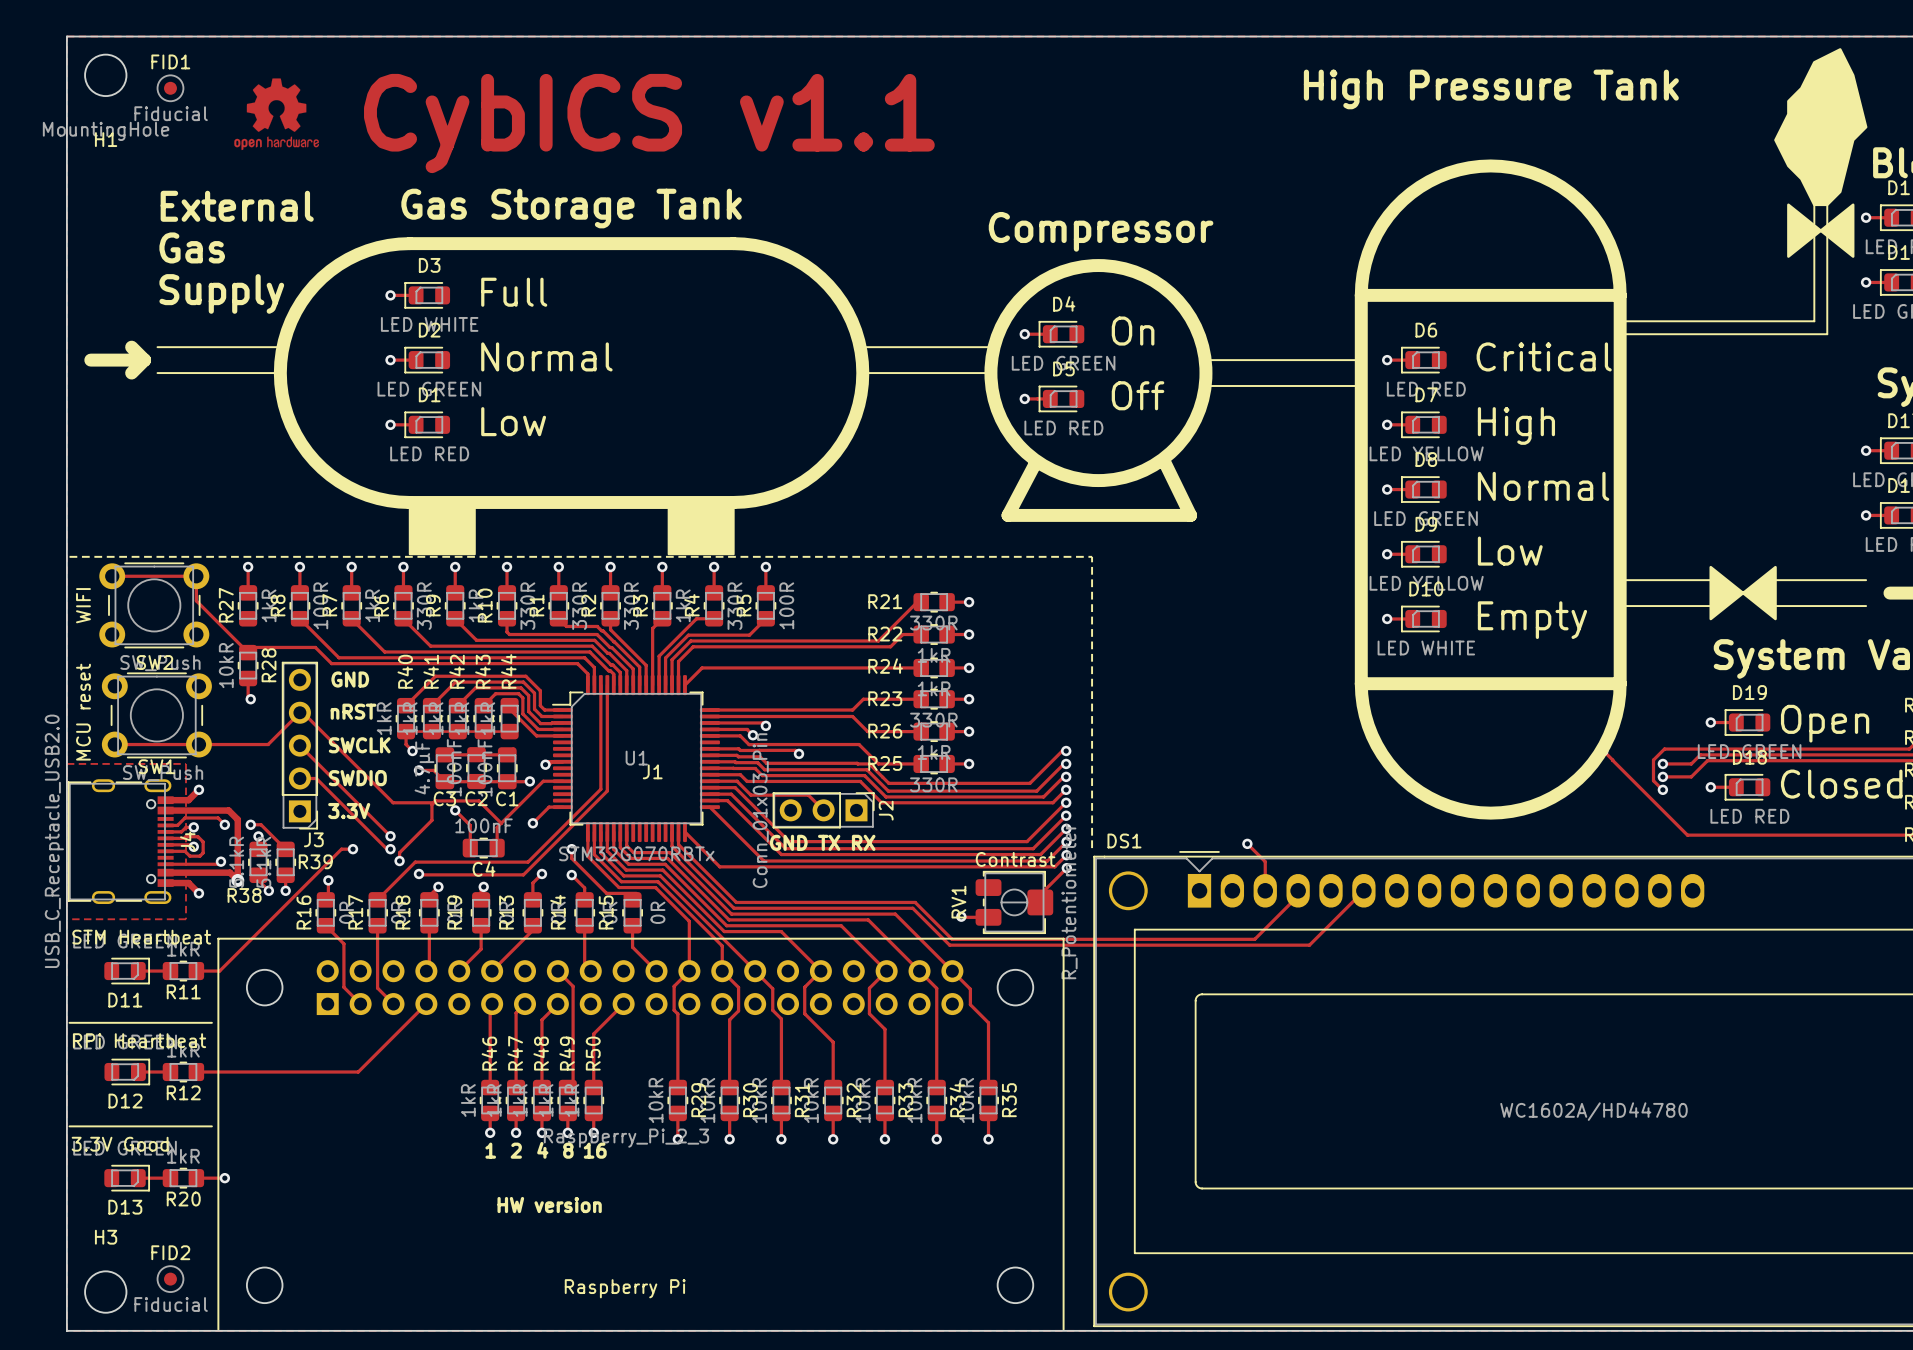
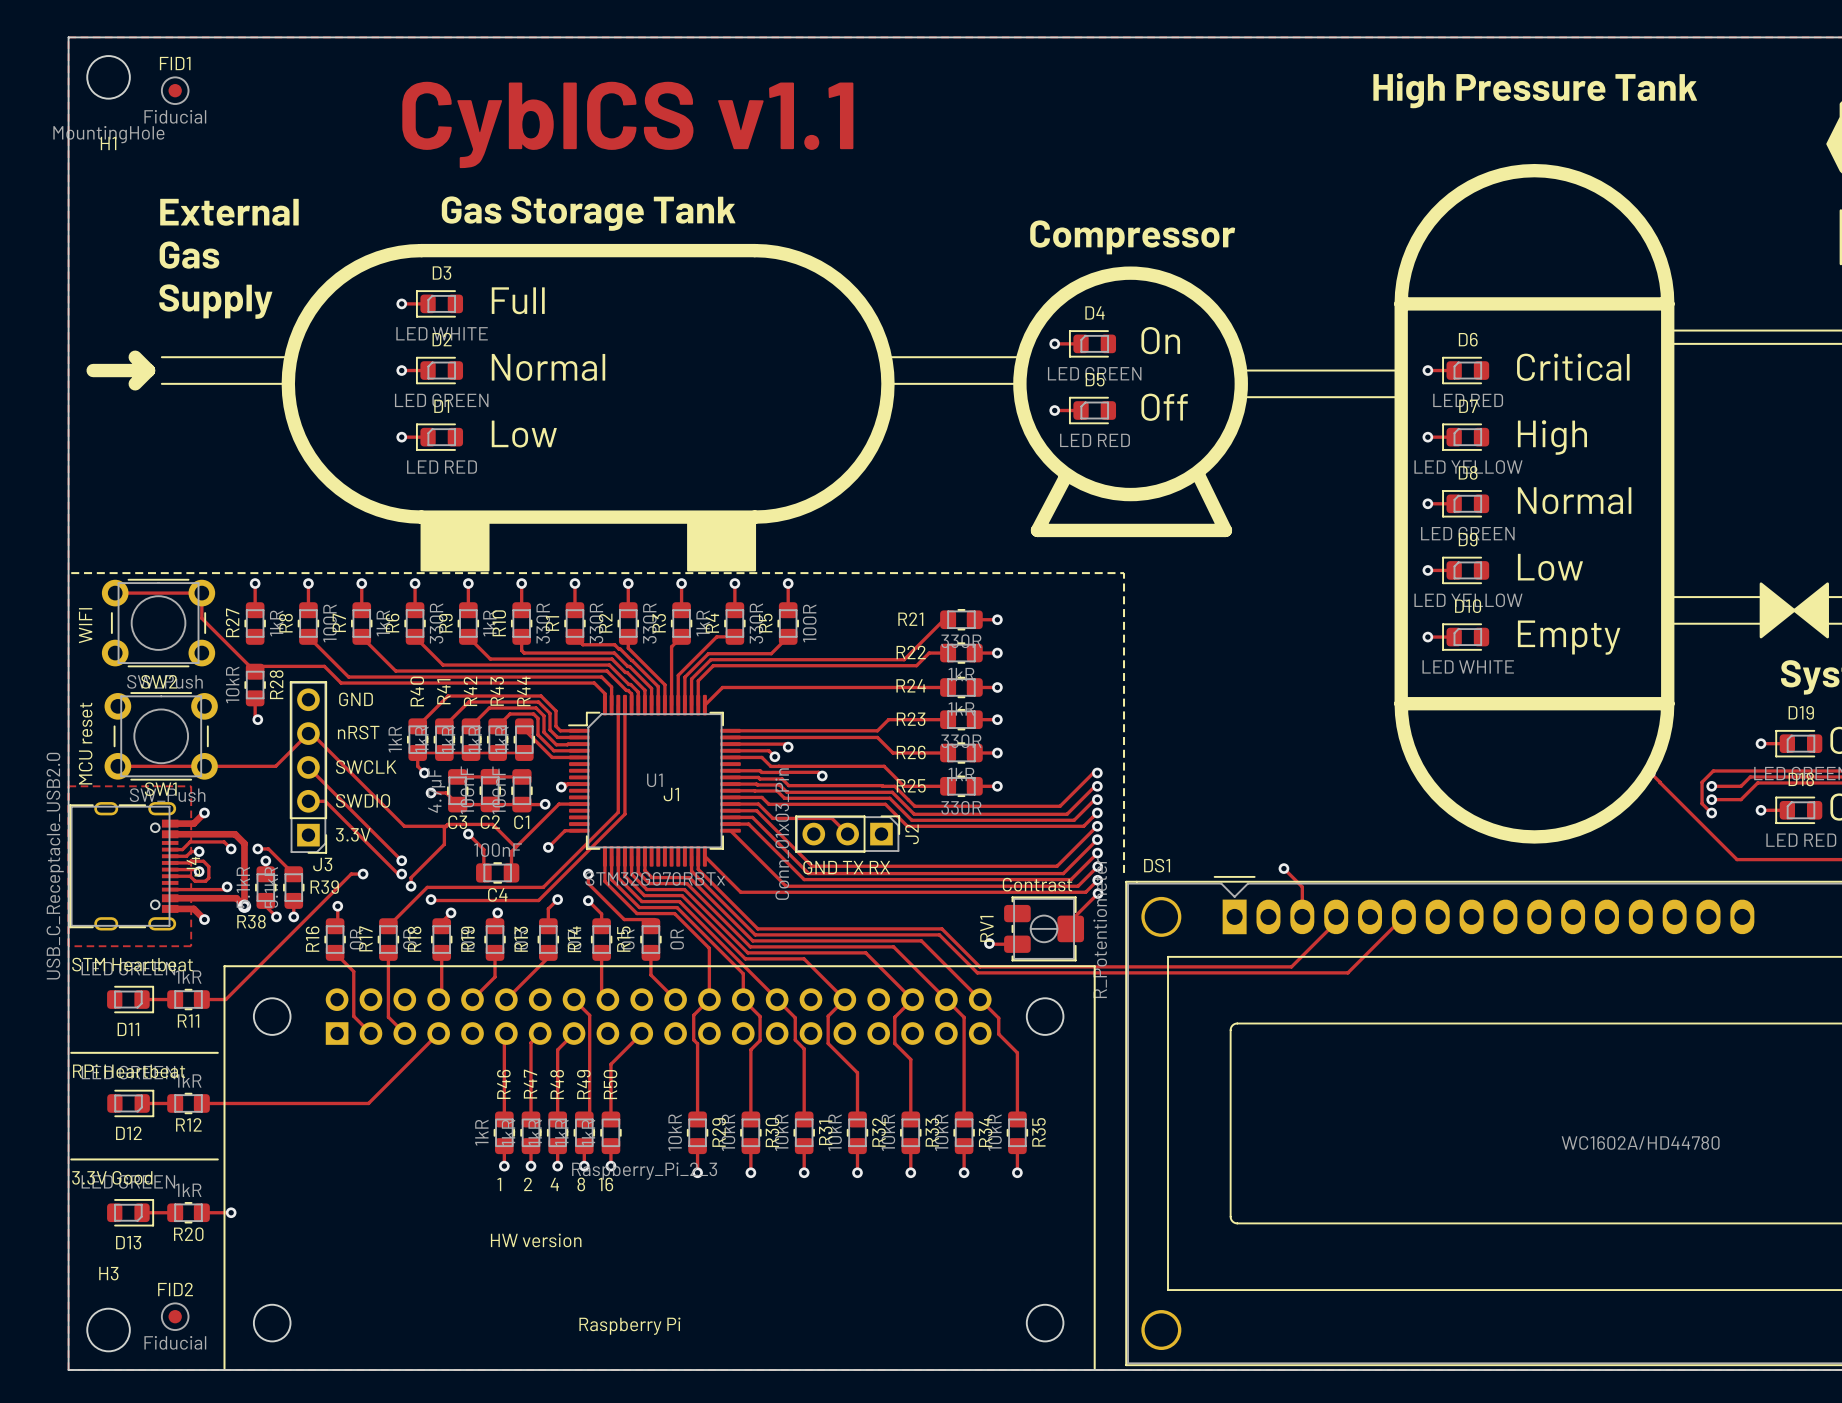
drawing: [234, 78, 319, 151] -> none
text position: CybICS v1.1 (649, 123) -> CybICS v1.1 (627, 124)

